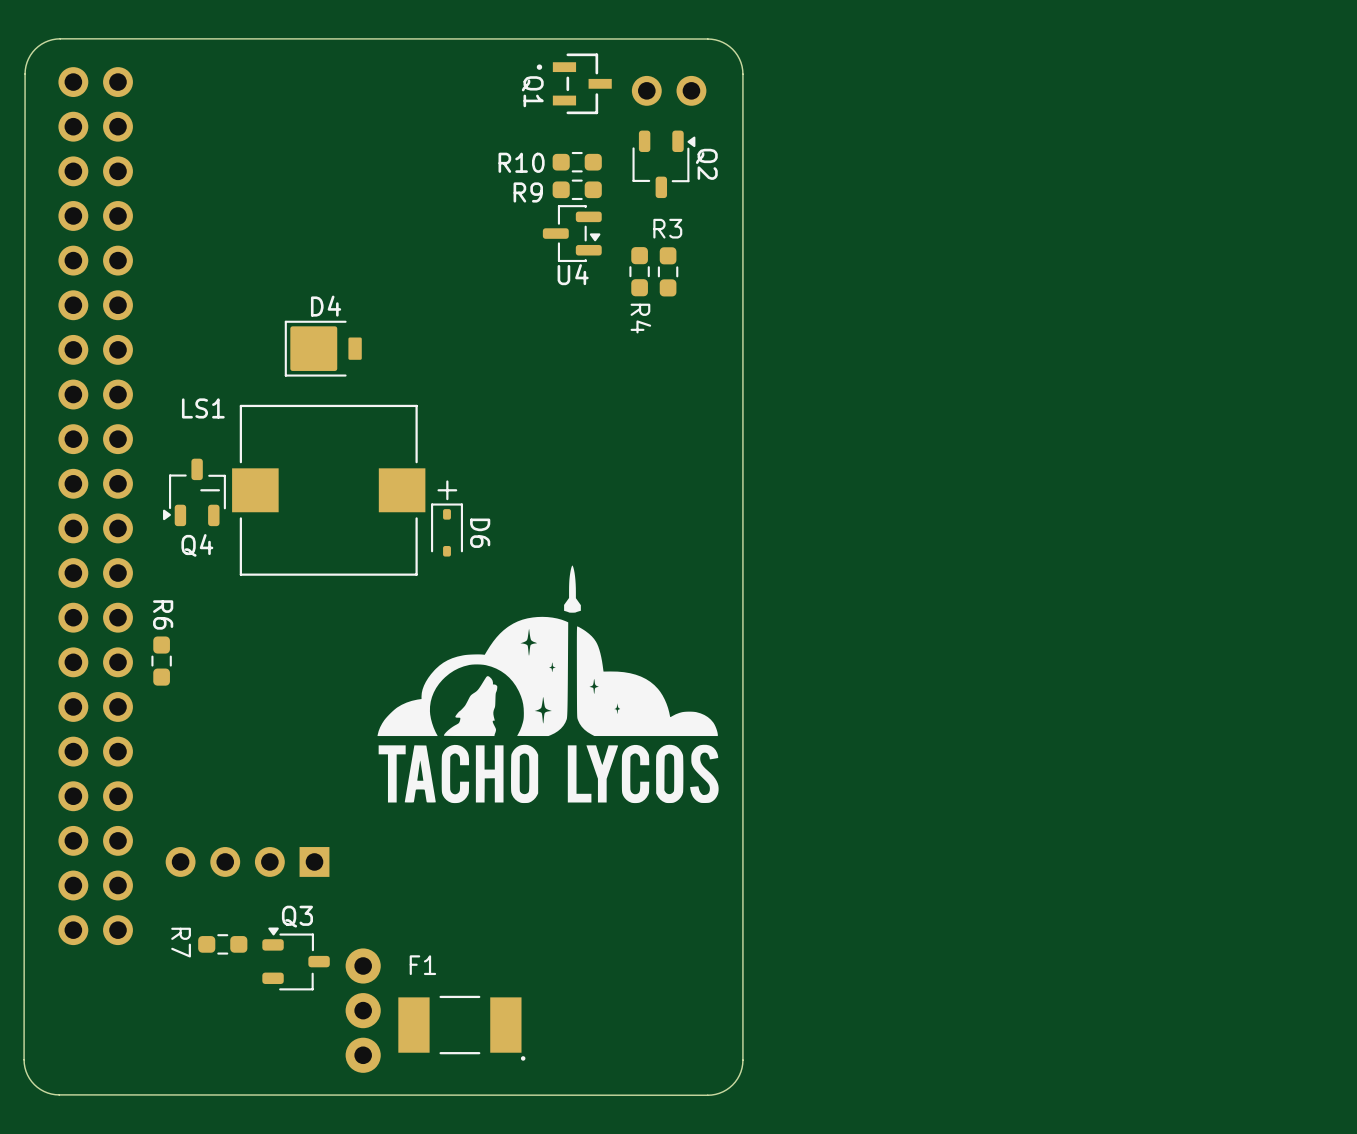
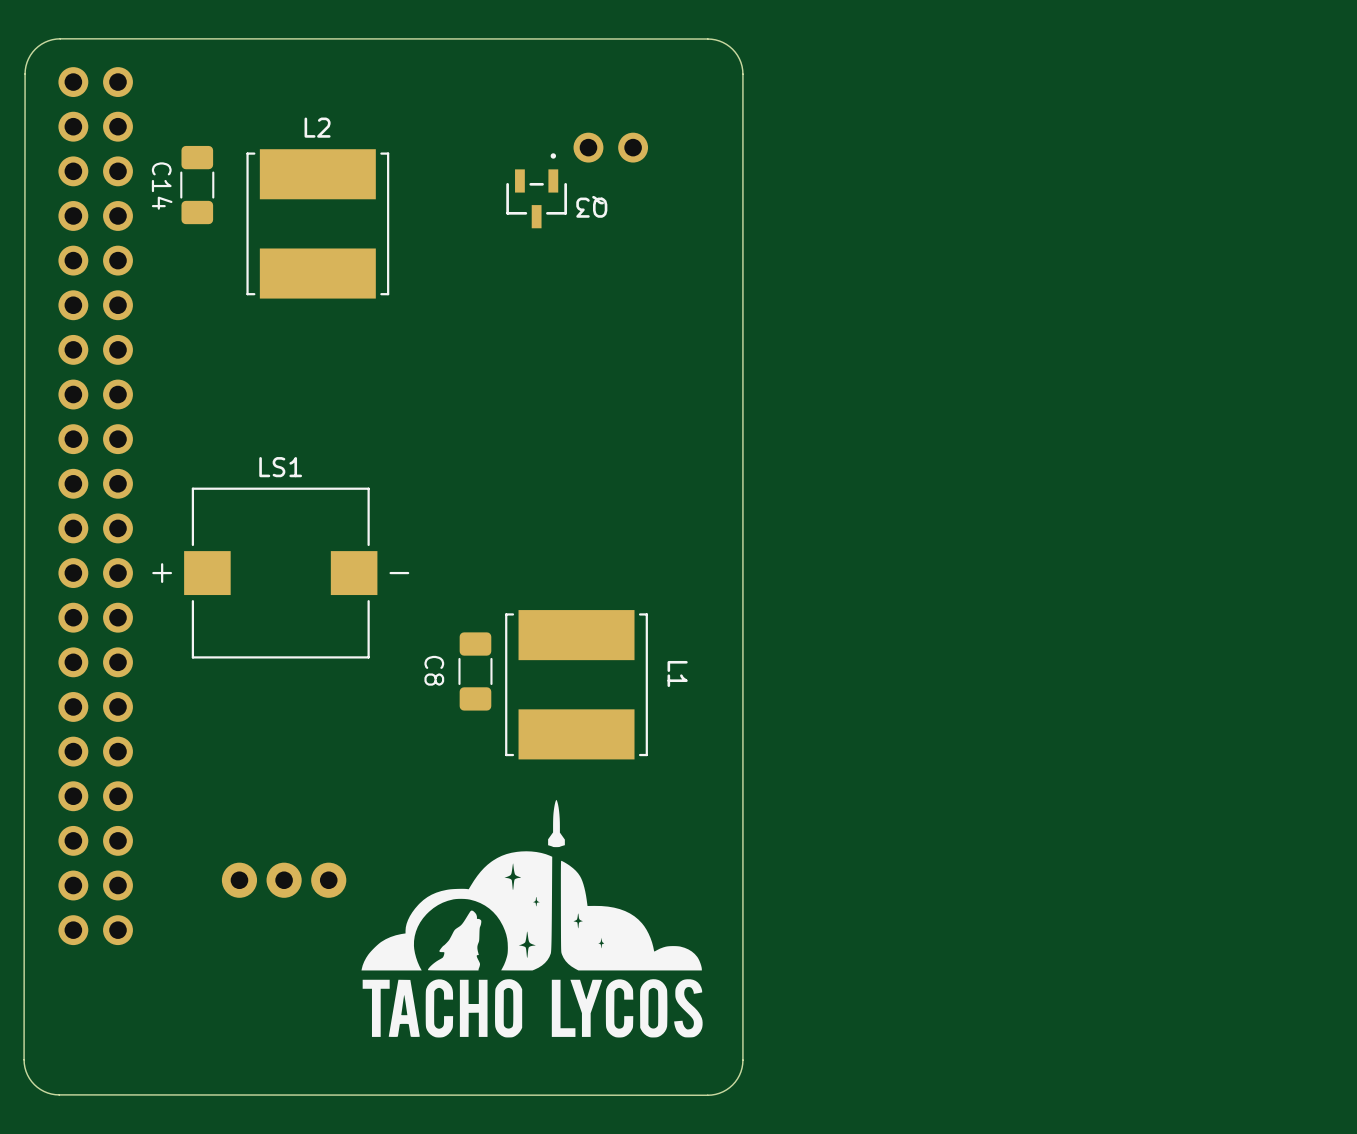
Q1: (574, 83) -> none
part position: (669, 90) -> (610, 147)
R10: (577, 162) -> none
Q2: (663, 164) -> none
C14: none -> (197, 185)
R9: (577, 189) -> none
L2: none -> (317, 223)
U4: (572, 233) -> none
R4: (639, 271) -> none
R3: (668, 271) -> none
D4: (323, 348) -> none
LS1 name position: LS1 (203, 408) -> LS1 (280, 467)
LS1 rotation: 0° (328, 490) -> 180° (280, 573)
Q4: (194, 492) -> none
D6: (447, 530) -> none
R6: (161, 661) -> none
C8: none -> (475, 671)
drawing position: (548, 684) -> (532, 918)
L1: none -> (576, 684)
part: (247, 861) -> none
Q3 name position: Q3 (297, 916) -> Q3 (591, 206)
Q3 footprint: [262, 927, 330, 991] -> [506, 153, 567, 229]
R7: (222, 944) -> none
part rotation: 0° (363, 1010) -> 90° clockwise (284, 880)
part position: (363, 1010) -> (284, 880)
F1: (461, 1028) -> none

